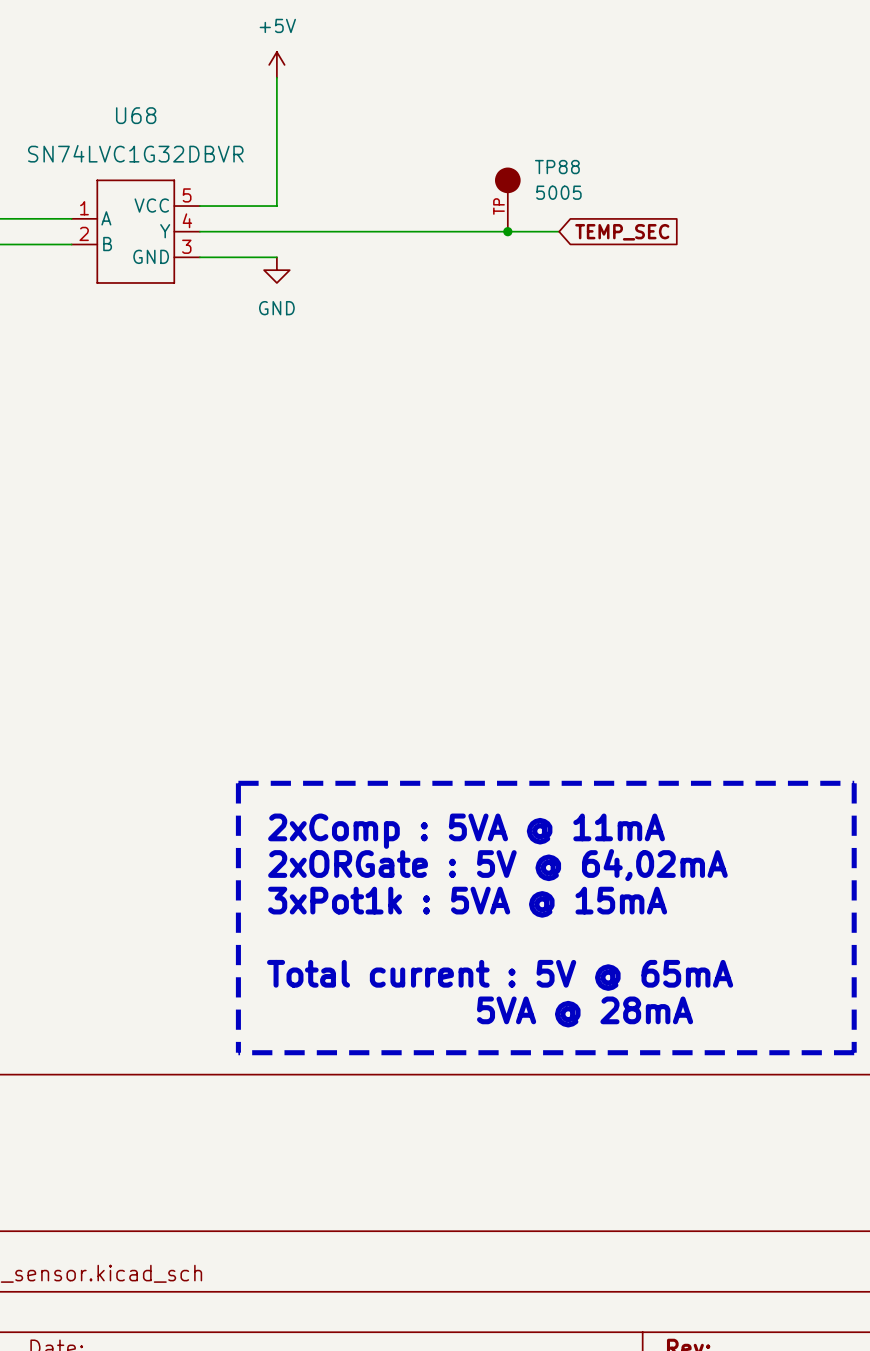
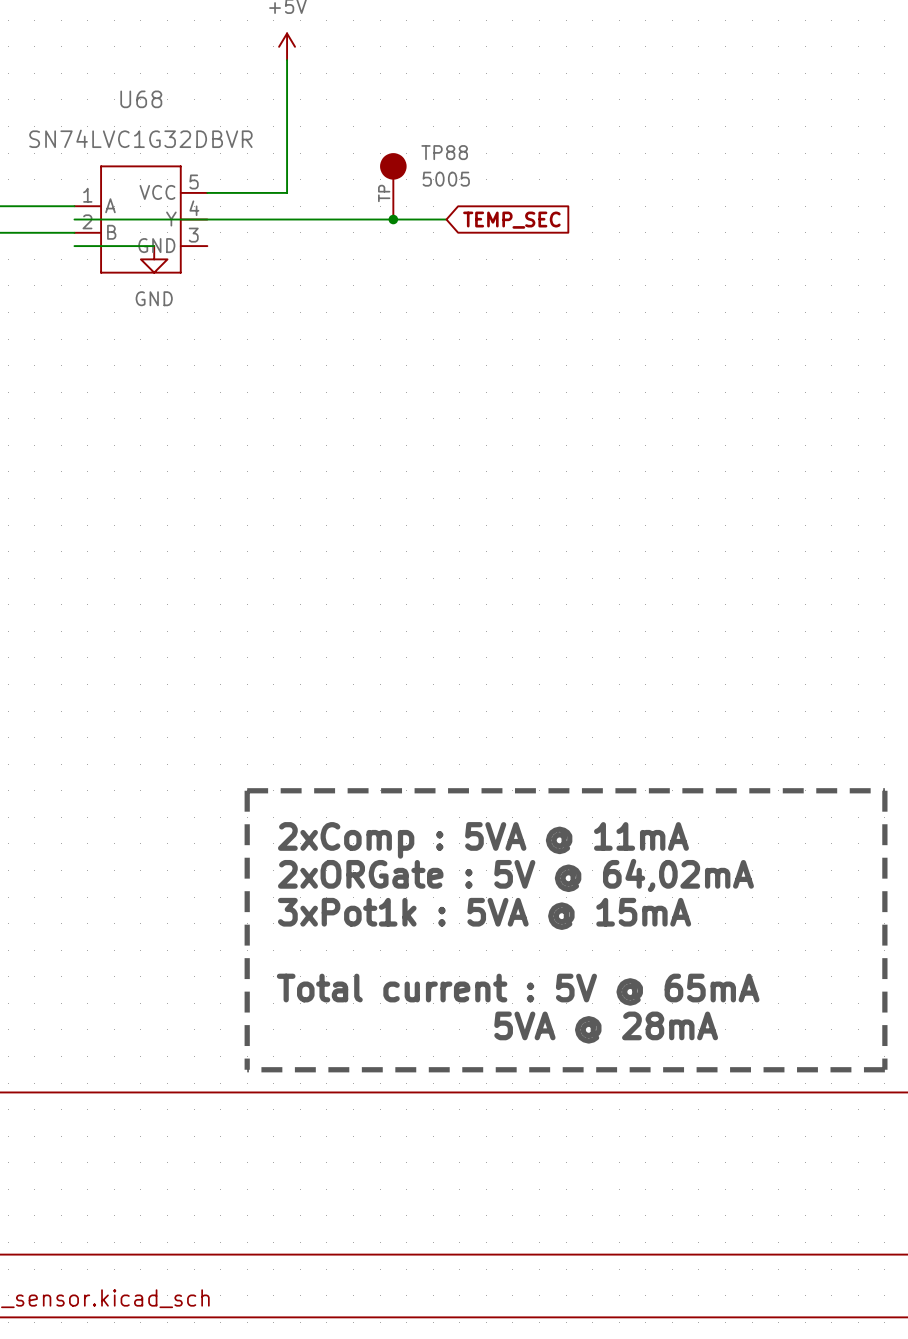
TP88 position: (507, 199) -> (393, 186)
wire: none -> (74, 219) (207, 219)
junction: none -> (393, 219)
wire: (430, 231) (559, 231) -> none
junction: (507, 231) -> none
global label position: TEMP_SEC (622, 232) -> TEMP_SEC (511, 220)
wire: (199, 257) (276, 257) -> (74, 246) (154, 246)
power symbol position: GND (276, 270) -> GND (154, 259)

